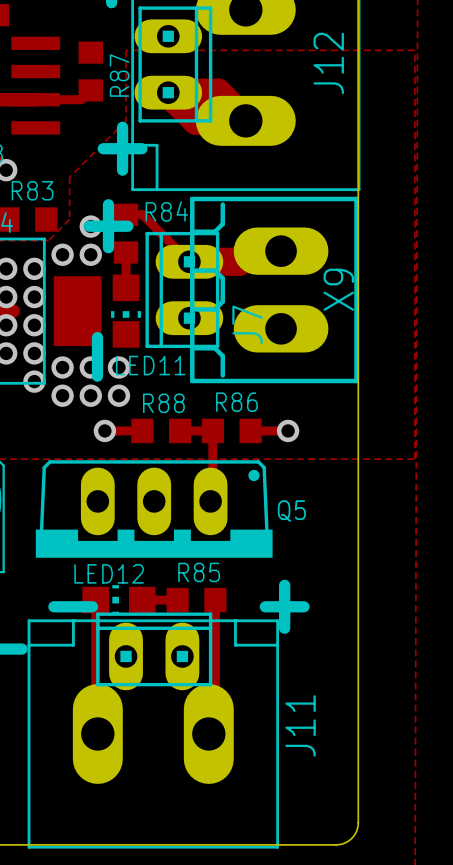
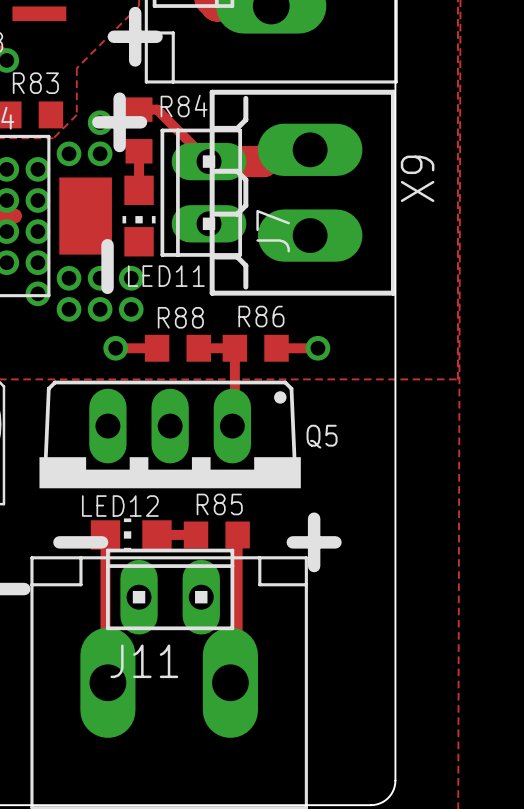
X9 name position: X9 (338, 289) -> X9 (417, 178)
J11 name rotation: 0° (300, 725) -> 90° clockwise (144, 661)
J11 name position: J11 (300, 725) -> J11 (144, 661)

